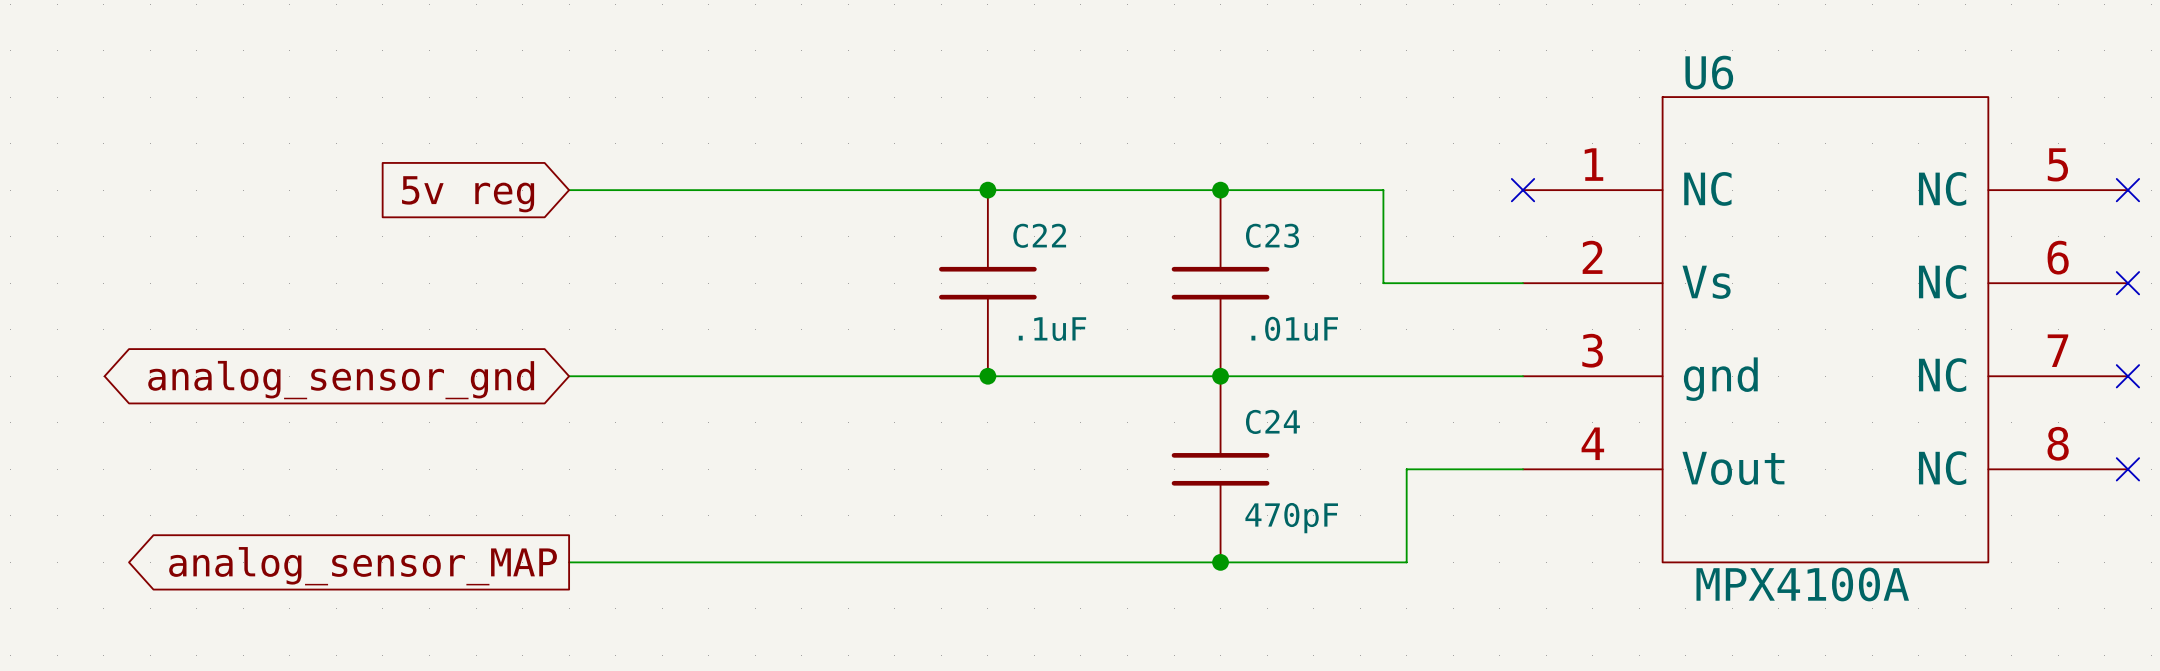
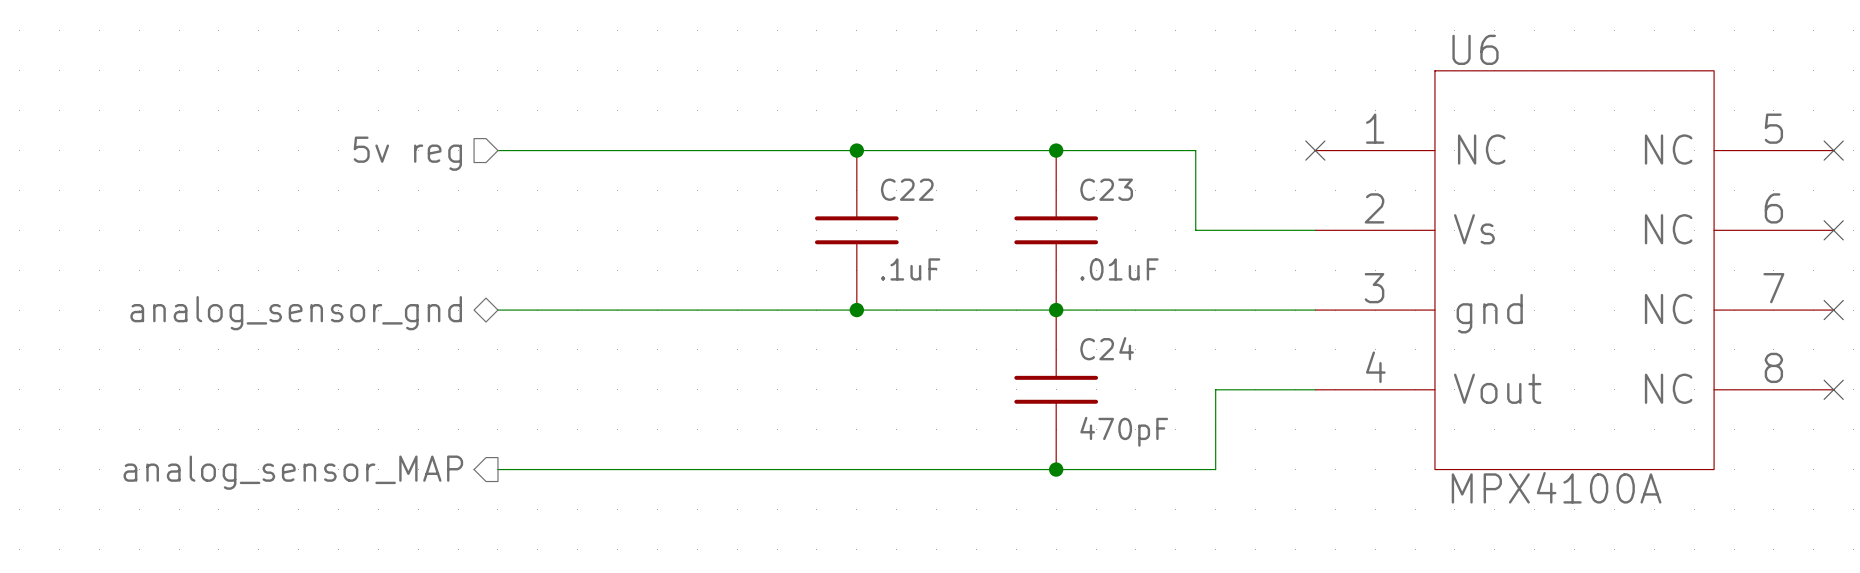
hierarchical label: none -> 5v reg (407, 153)
global label: 5v reg (468, 194) -> none
hierarchical label: none -> analog_sensor_gnd (296, 313)
global label: analog_sensor_gnd (341, 380) -> none
hierarchical label: none -> analog_sensor_MAP (293, 472)
global label: analog_sensor_MAP (363, 566) -> none

